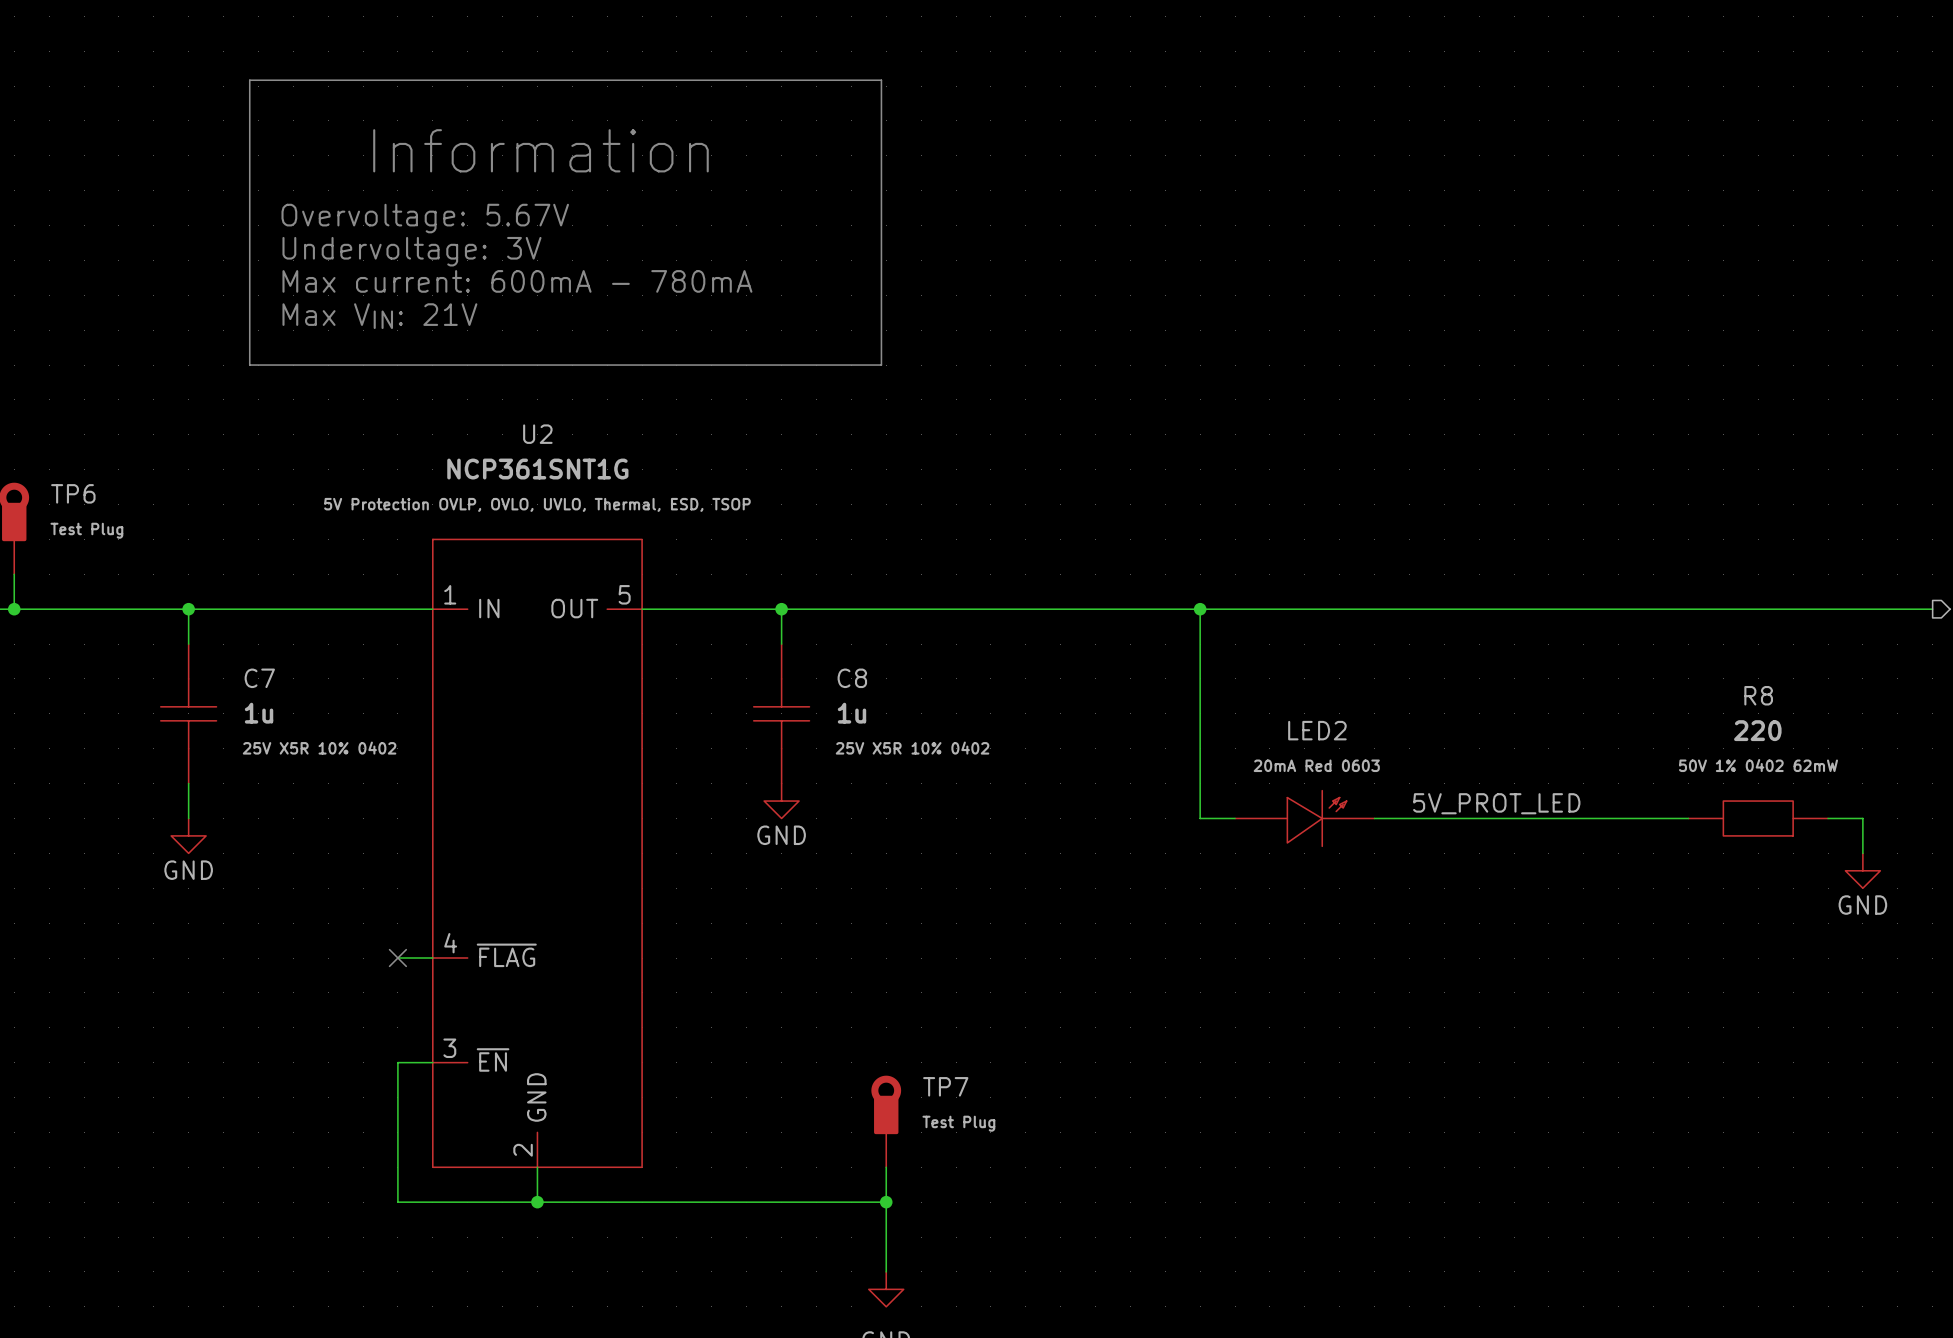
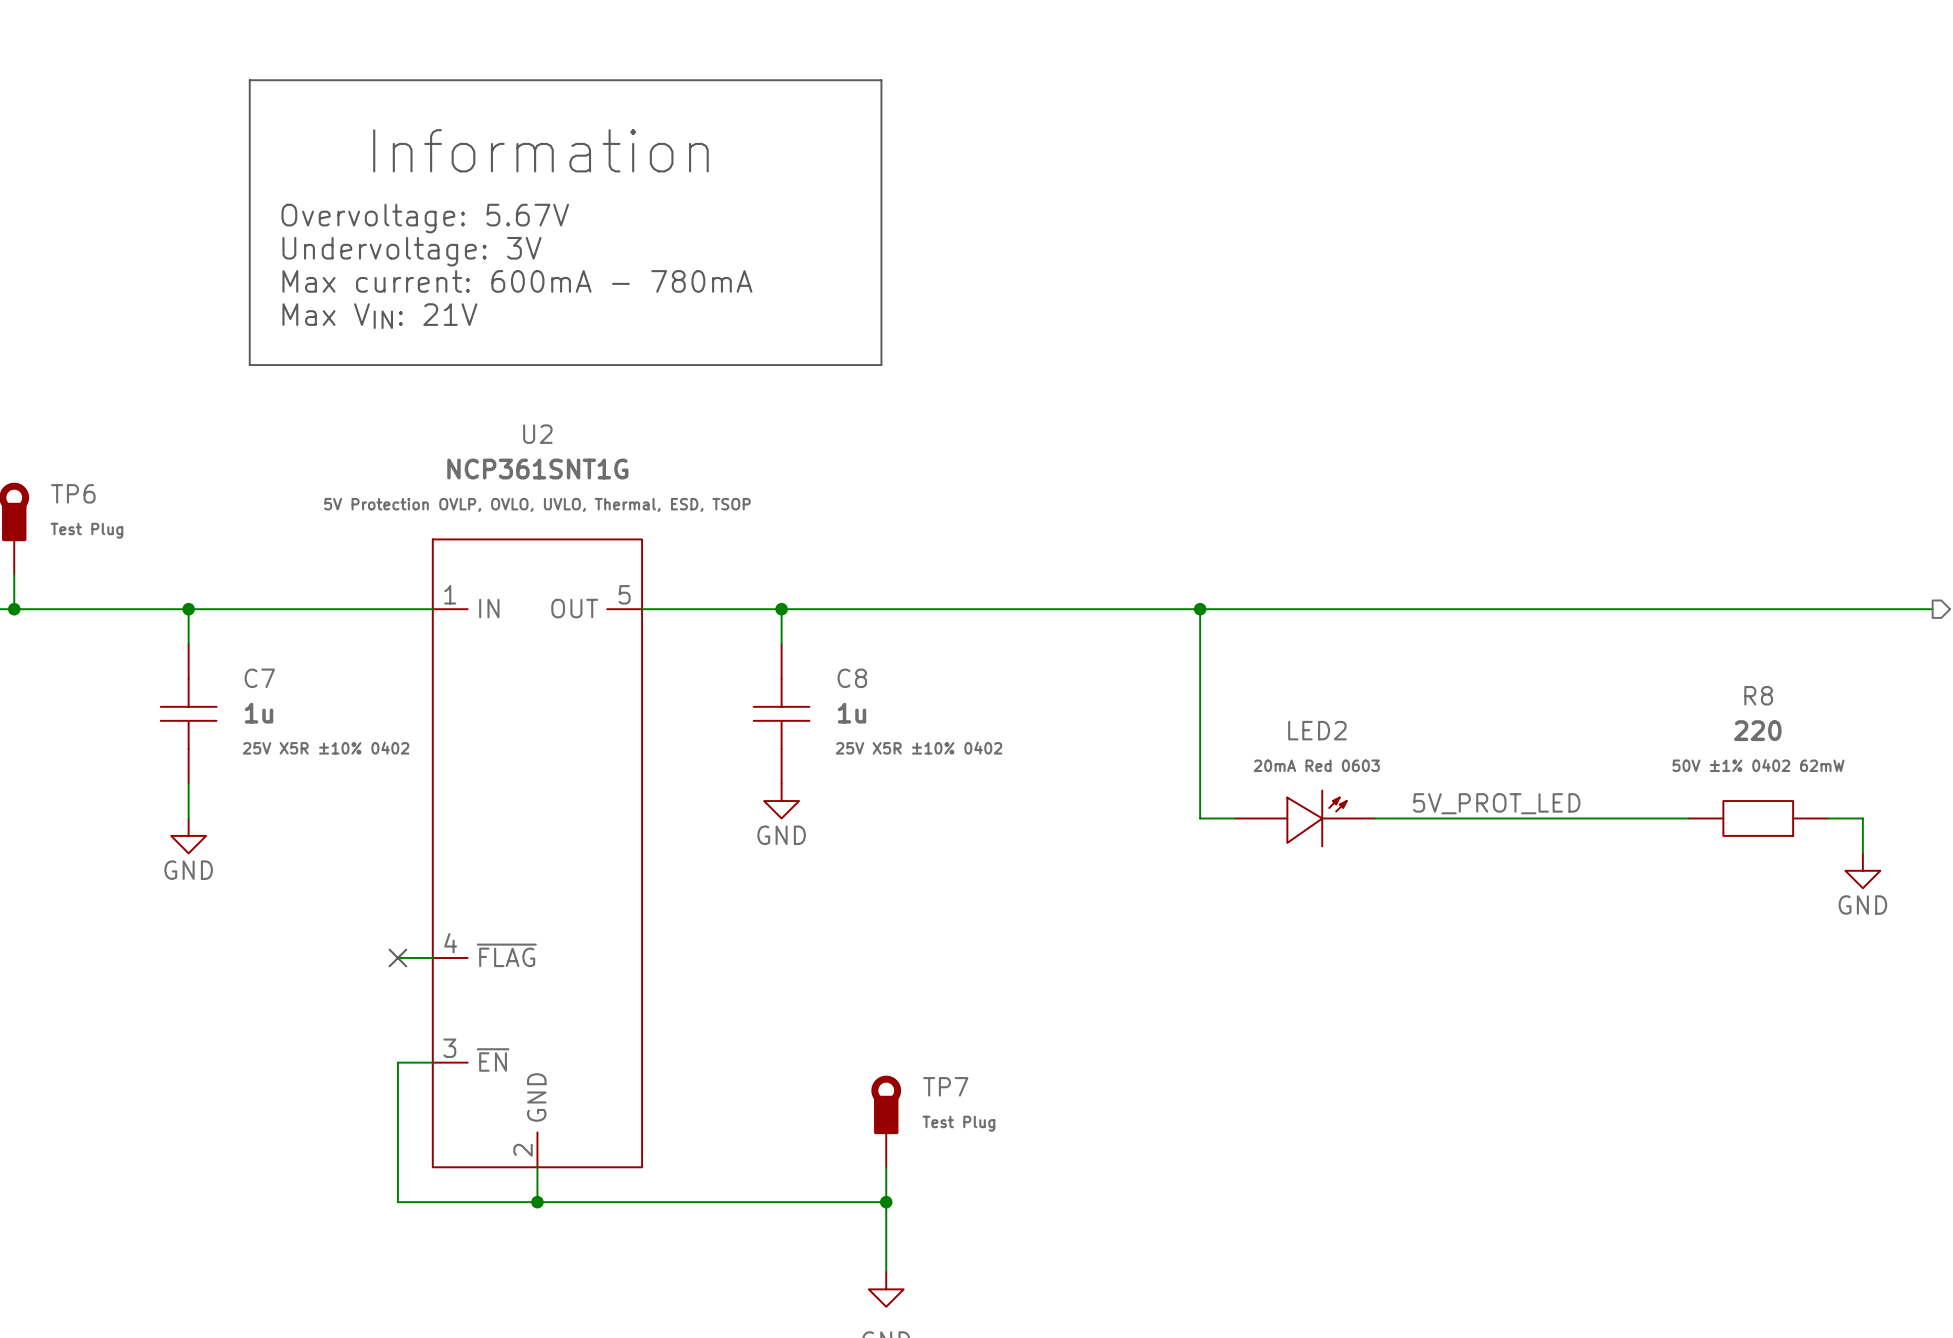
C7 text: 25V X5R 10% 0402 (319, 748) -> 25V X5R ±10% 0402 (326, 748)
C8 text: 25V X5R 10% 0402 (912, 748) -> 25V X5R ±10% 0402 (919, 748)
R8 text: 50V 1% 0402 62mW (1758, 765) -> 50V ±1% 0402 62mW (1758, 765)

